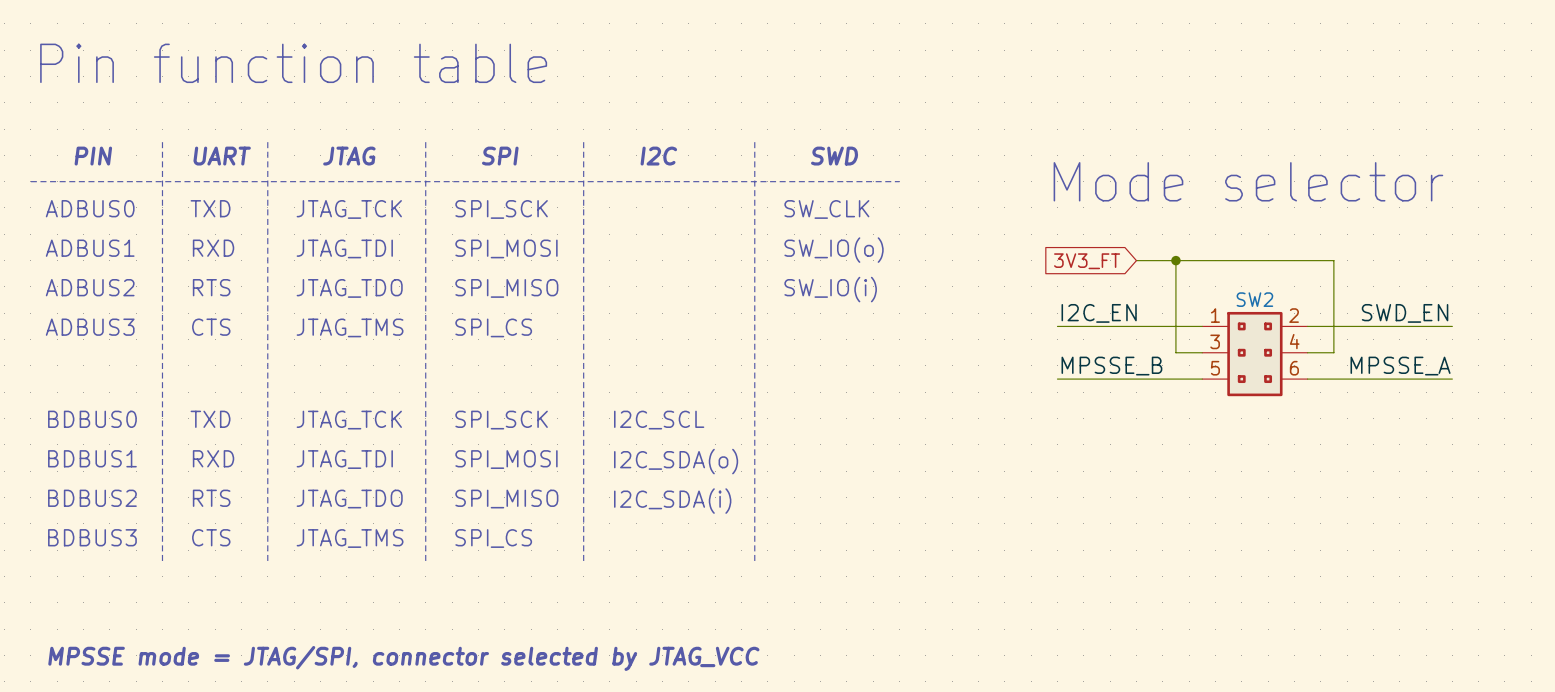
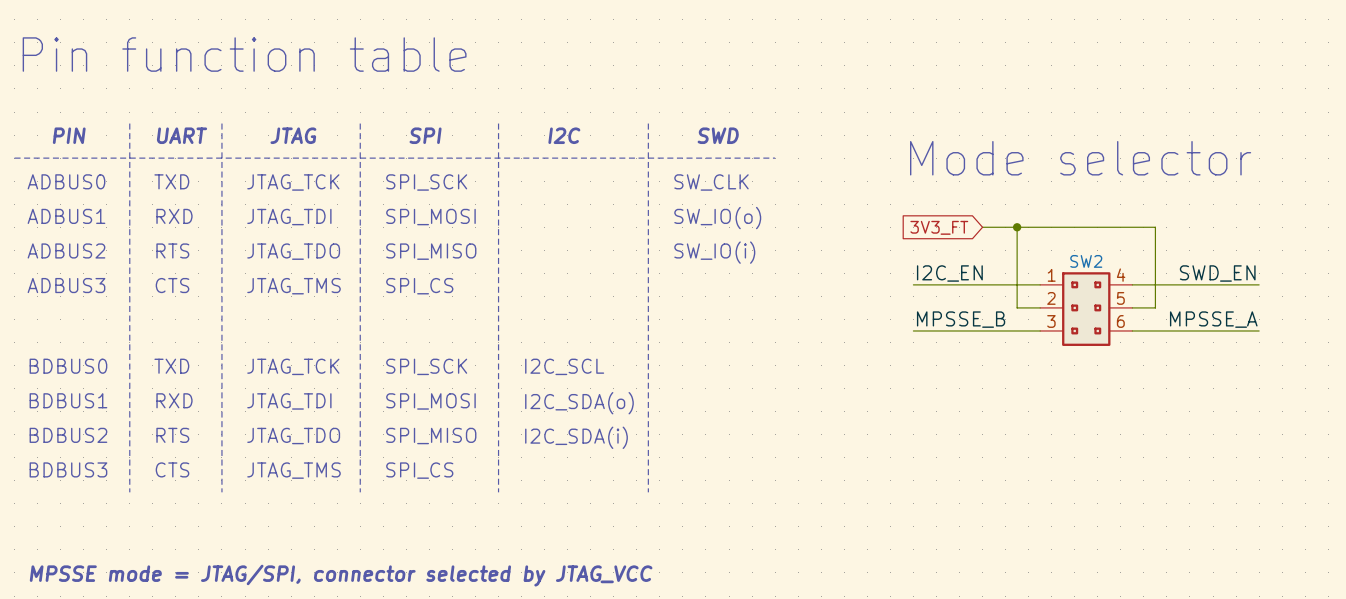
SW2 pin number: 2 (1294, 315) -> 4 (1121, 275)
SW2 pin number: 3 (1215, 341) -> 2 (1051, 298)
SW2 pin number: 4 (1294, 341) -> 5 (1120, 298)
SW2 pin number: 5 (1215, 368) -> 3 (1051, 321)

